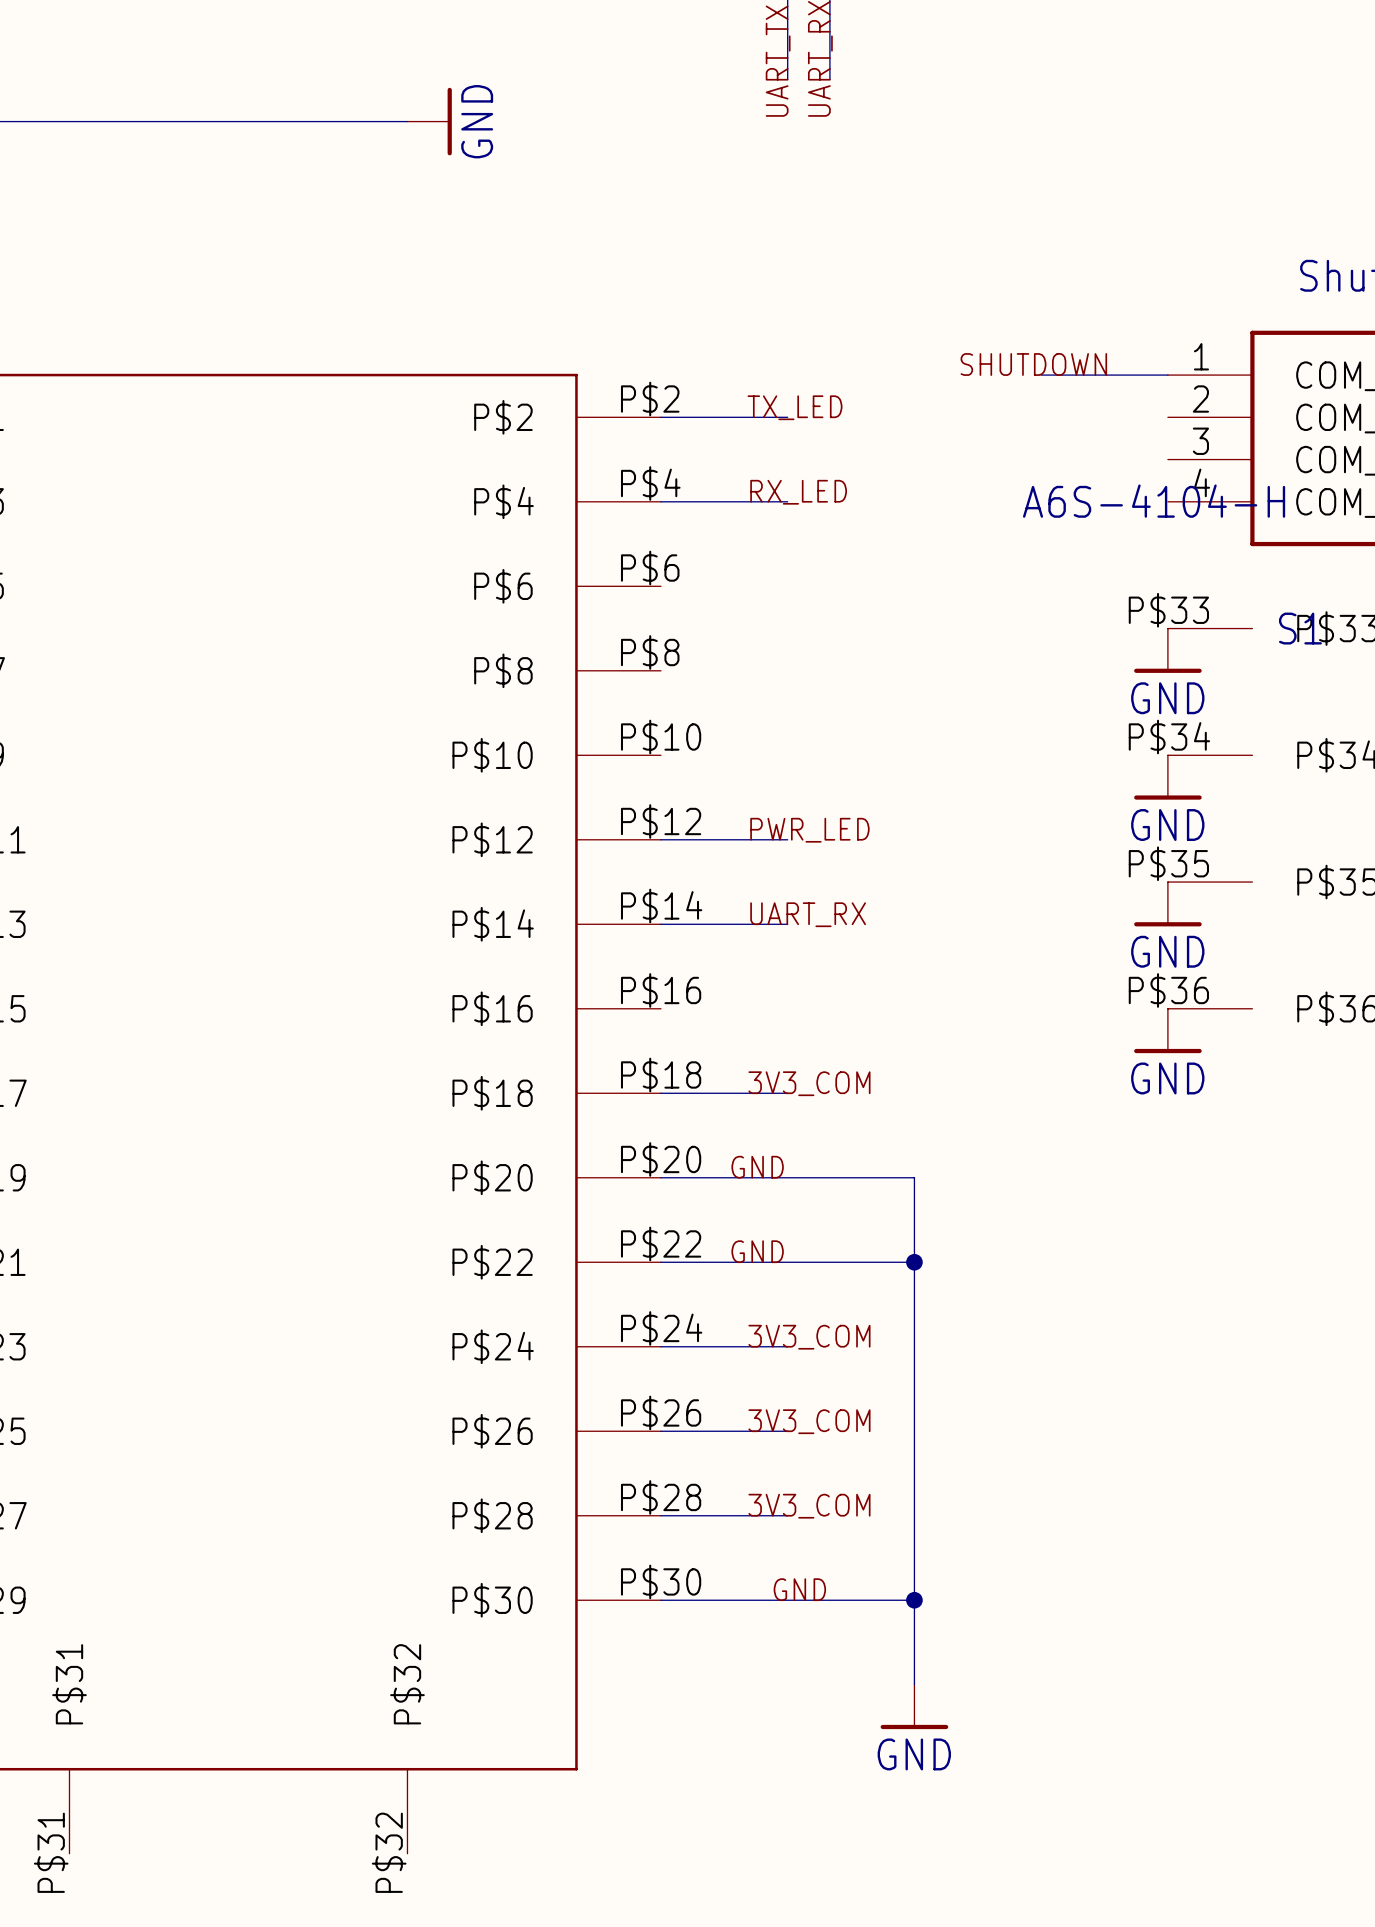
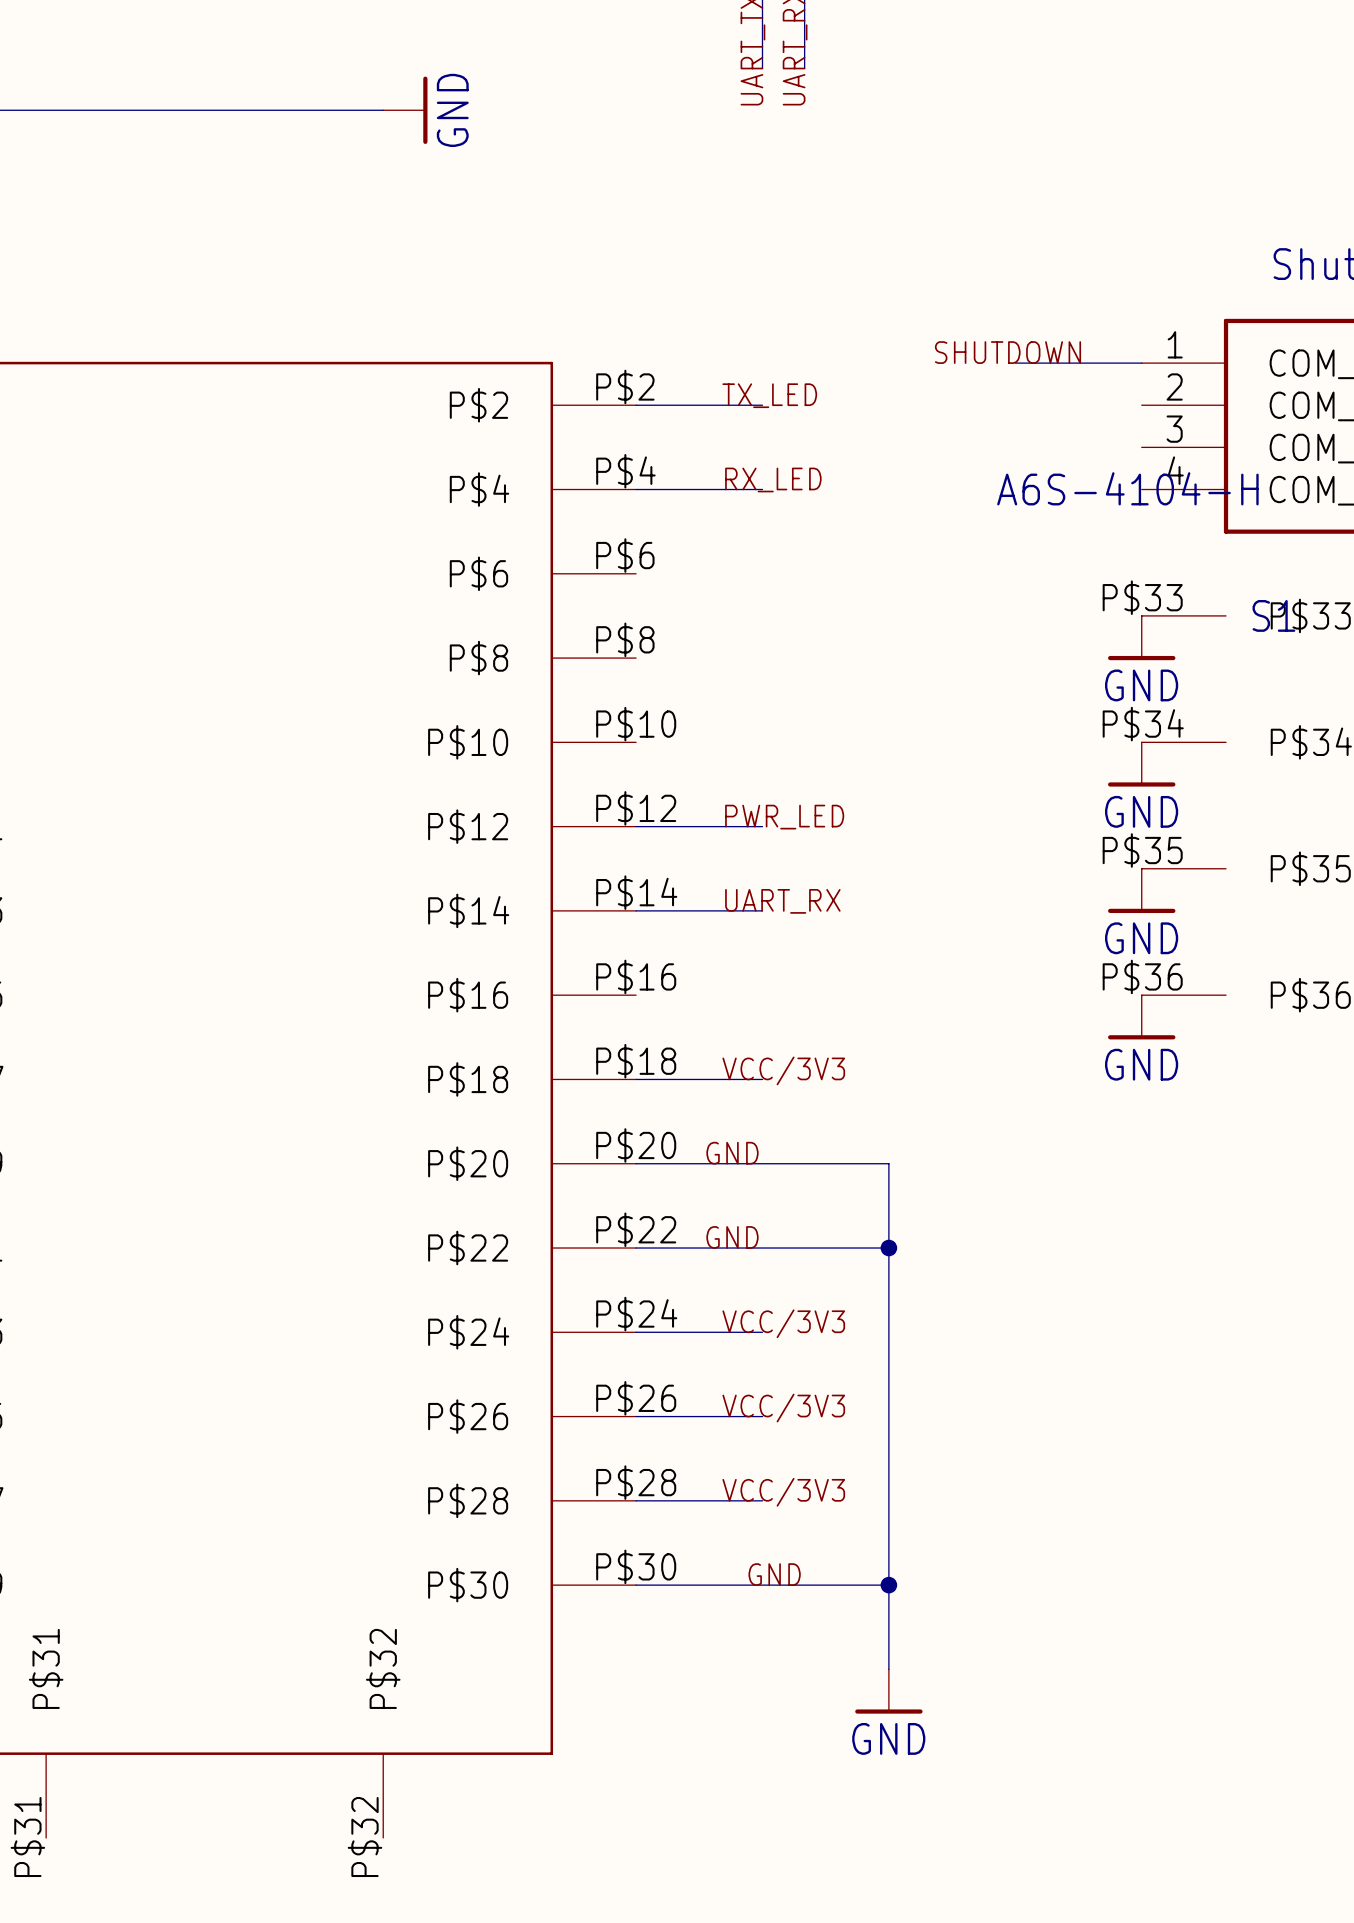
label: 3V3_COM (809, 1083) -> VCC/3V3 (783, 1070)
label: 3V3_COM (809, 1337) -> VCC/3V3 (783, 1323)
label: 3V3_COM (809, 1421) -> VCC/3V3 (783, 1408)
label: 3V3_COM (809, 1506) -> VCC/3V3 (783, 1492)

